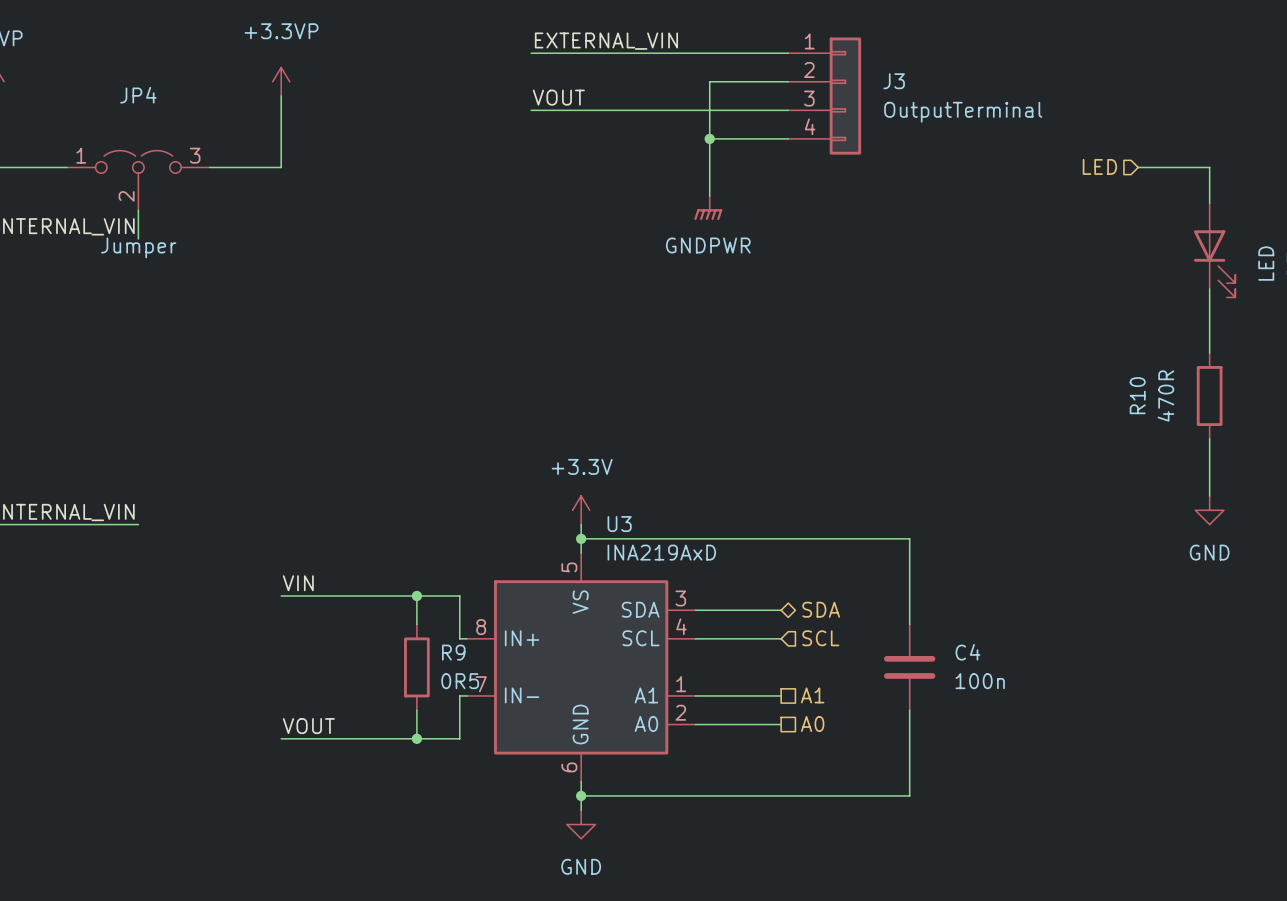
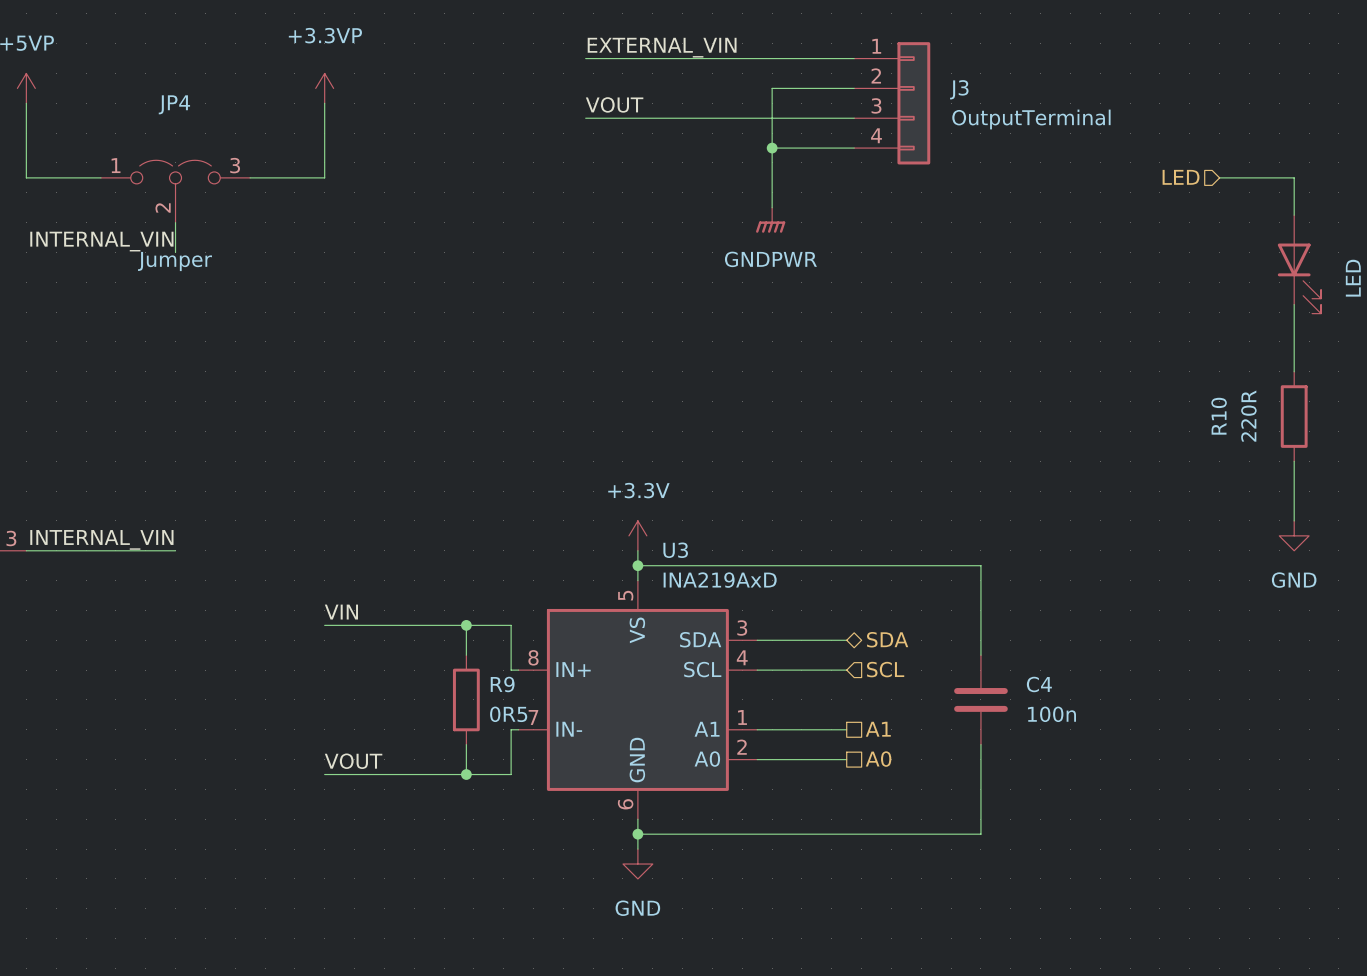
R10 value: 470R (1165, 396) -> 220R (1248, 416)

